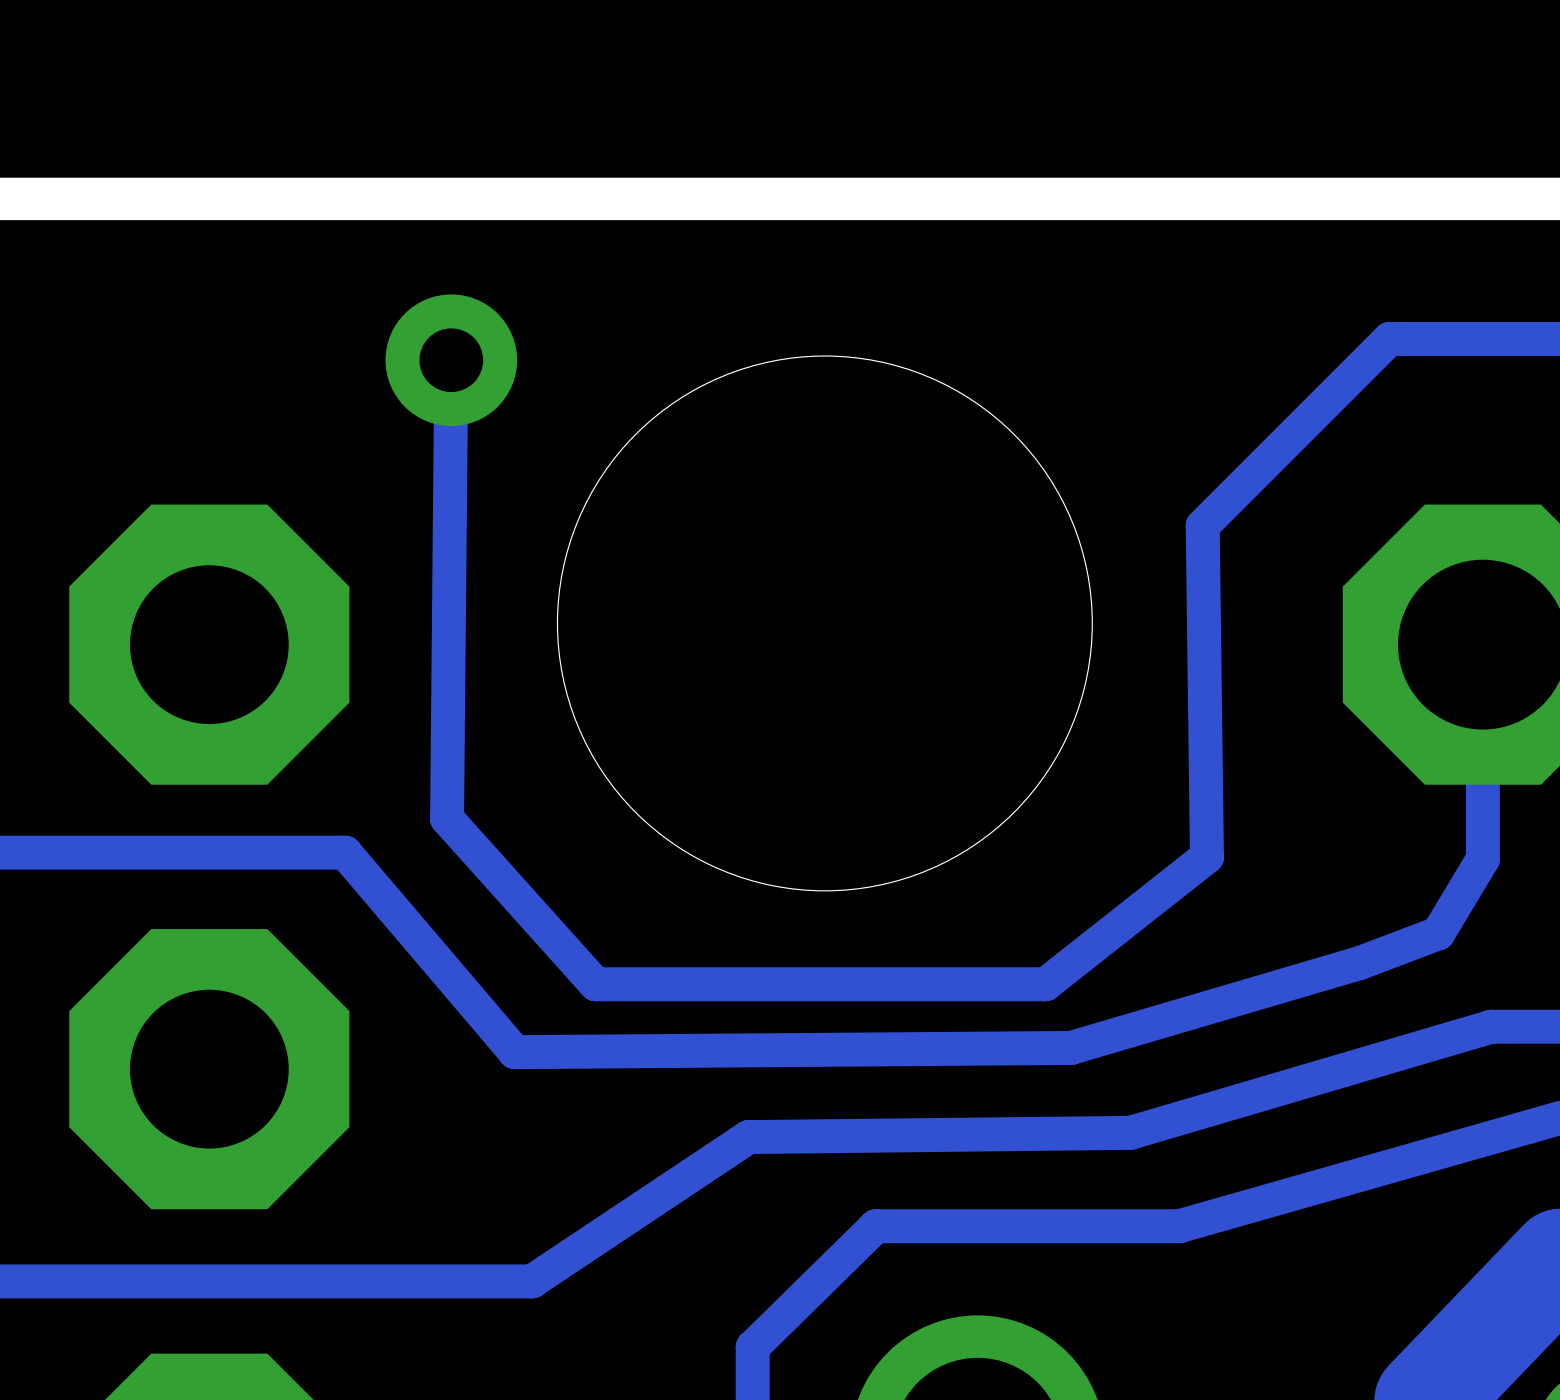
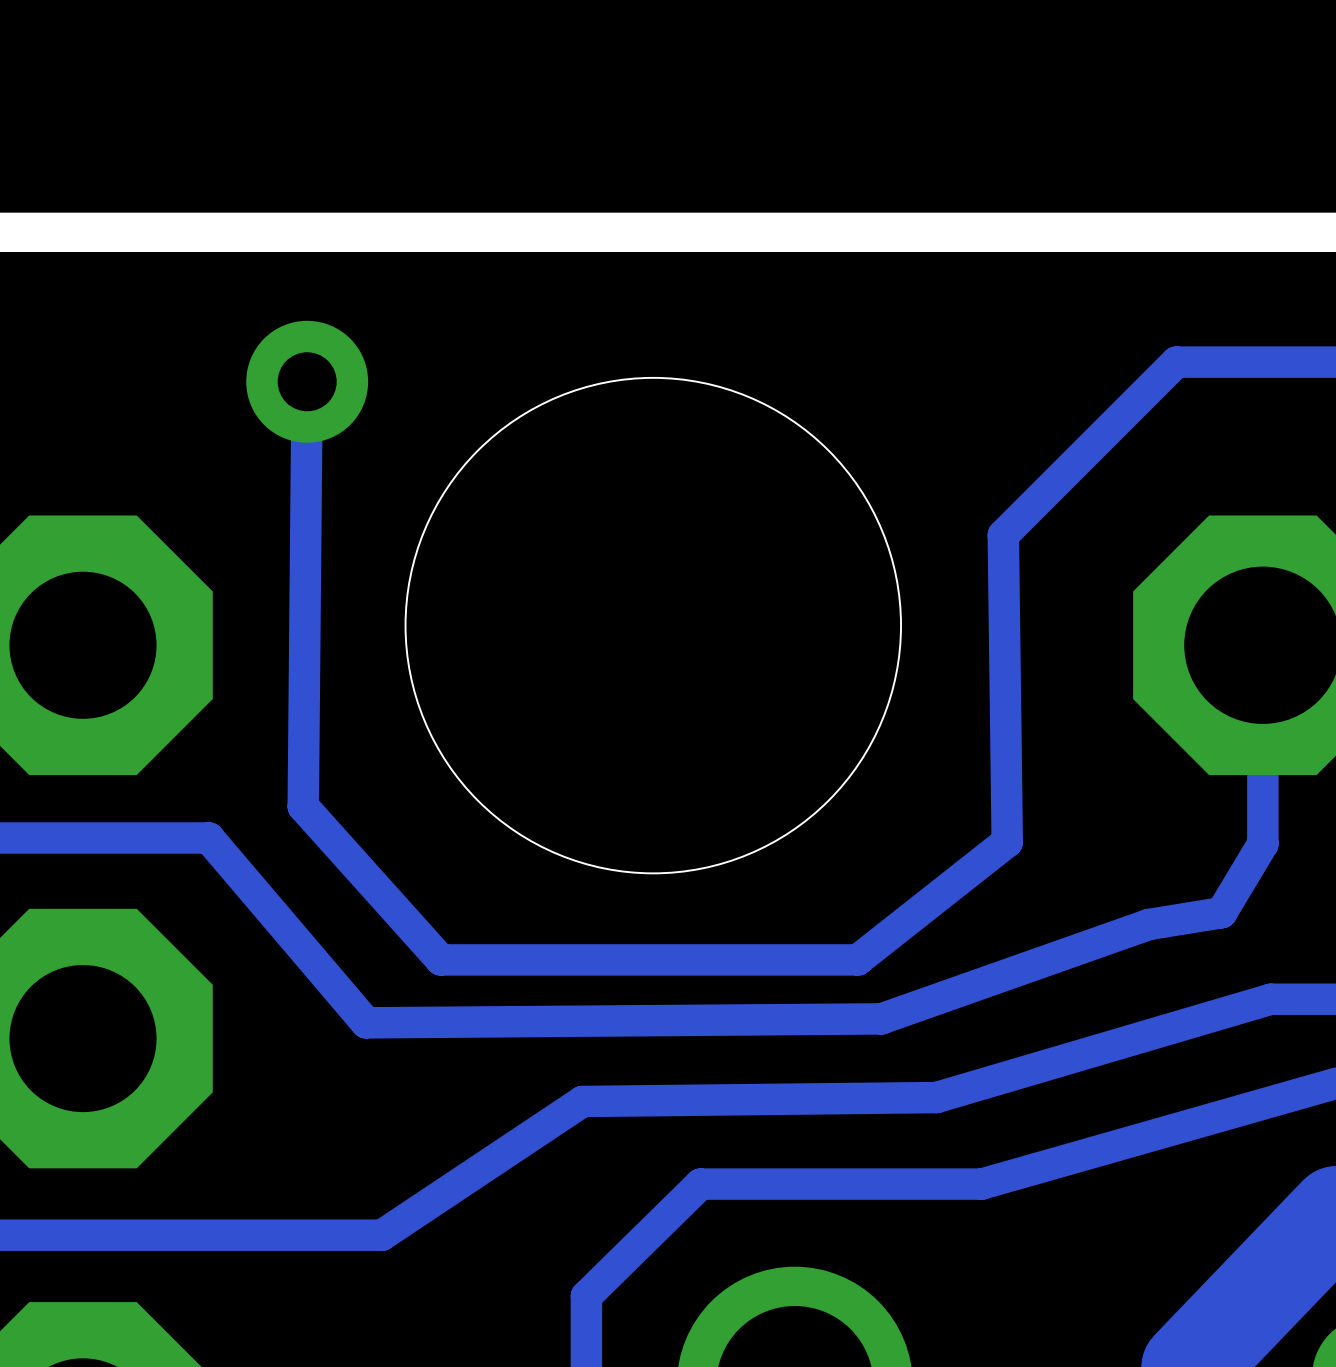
track: (1438, 933) (1359, 963) (1071, 1047) -> (1221, 912) (1148, 924) (881, 1018)

